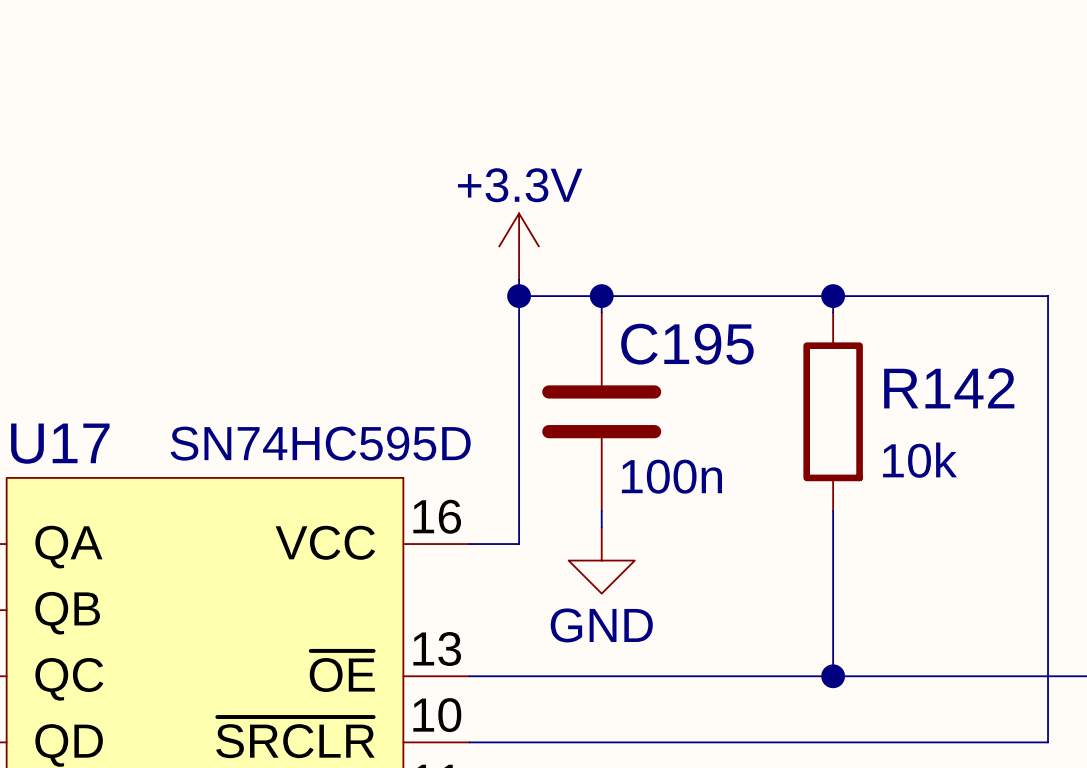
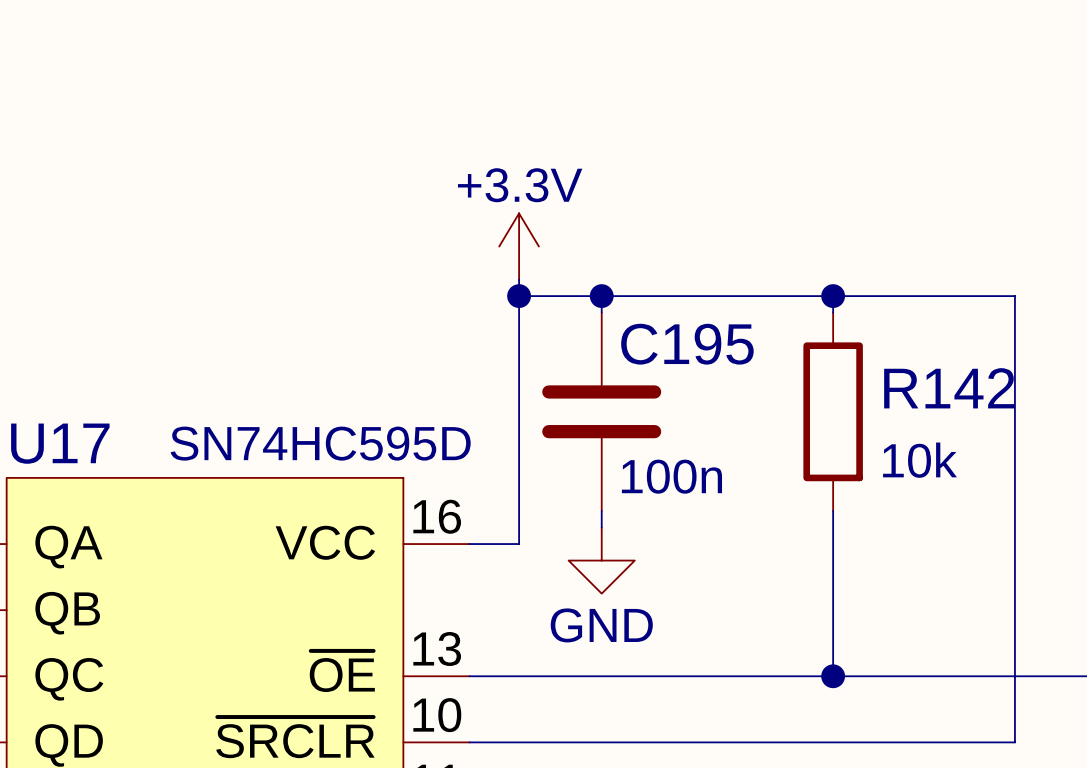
wire: (1014, 296) (1048, 296) (1048, 742) (1014, 742) -> (1014, 296) (1014, 742)

